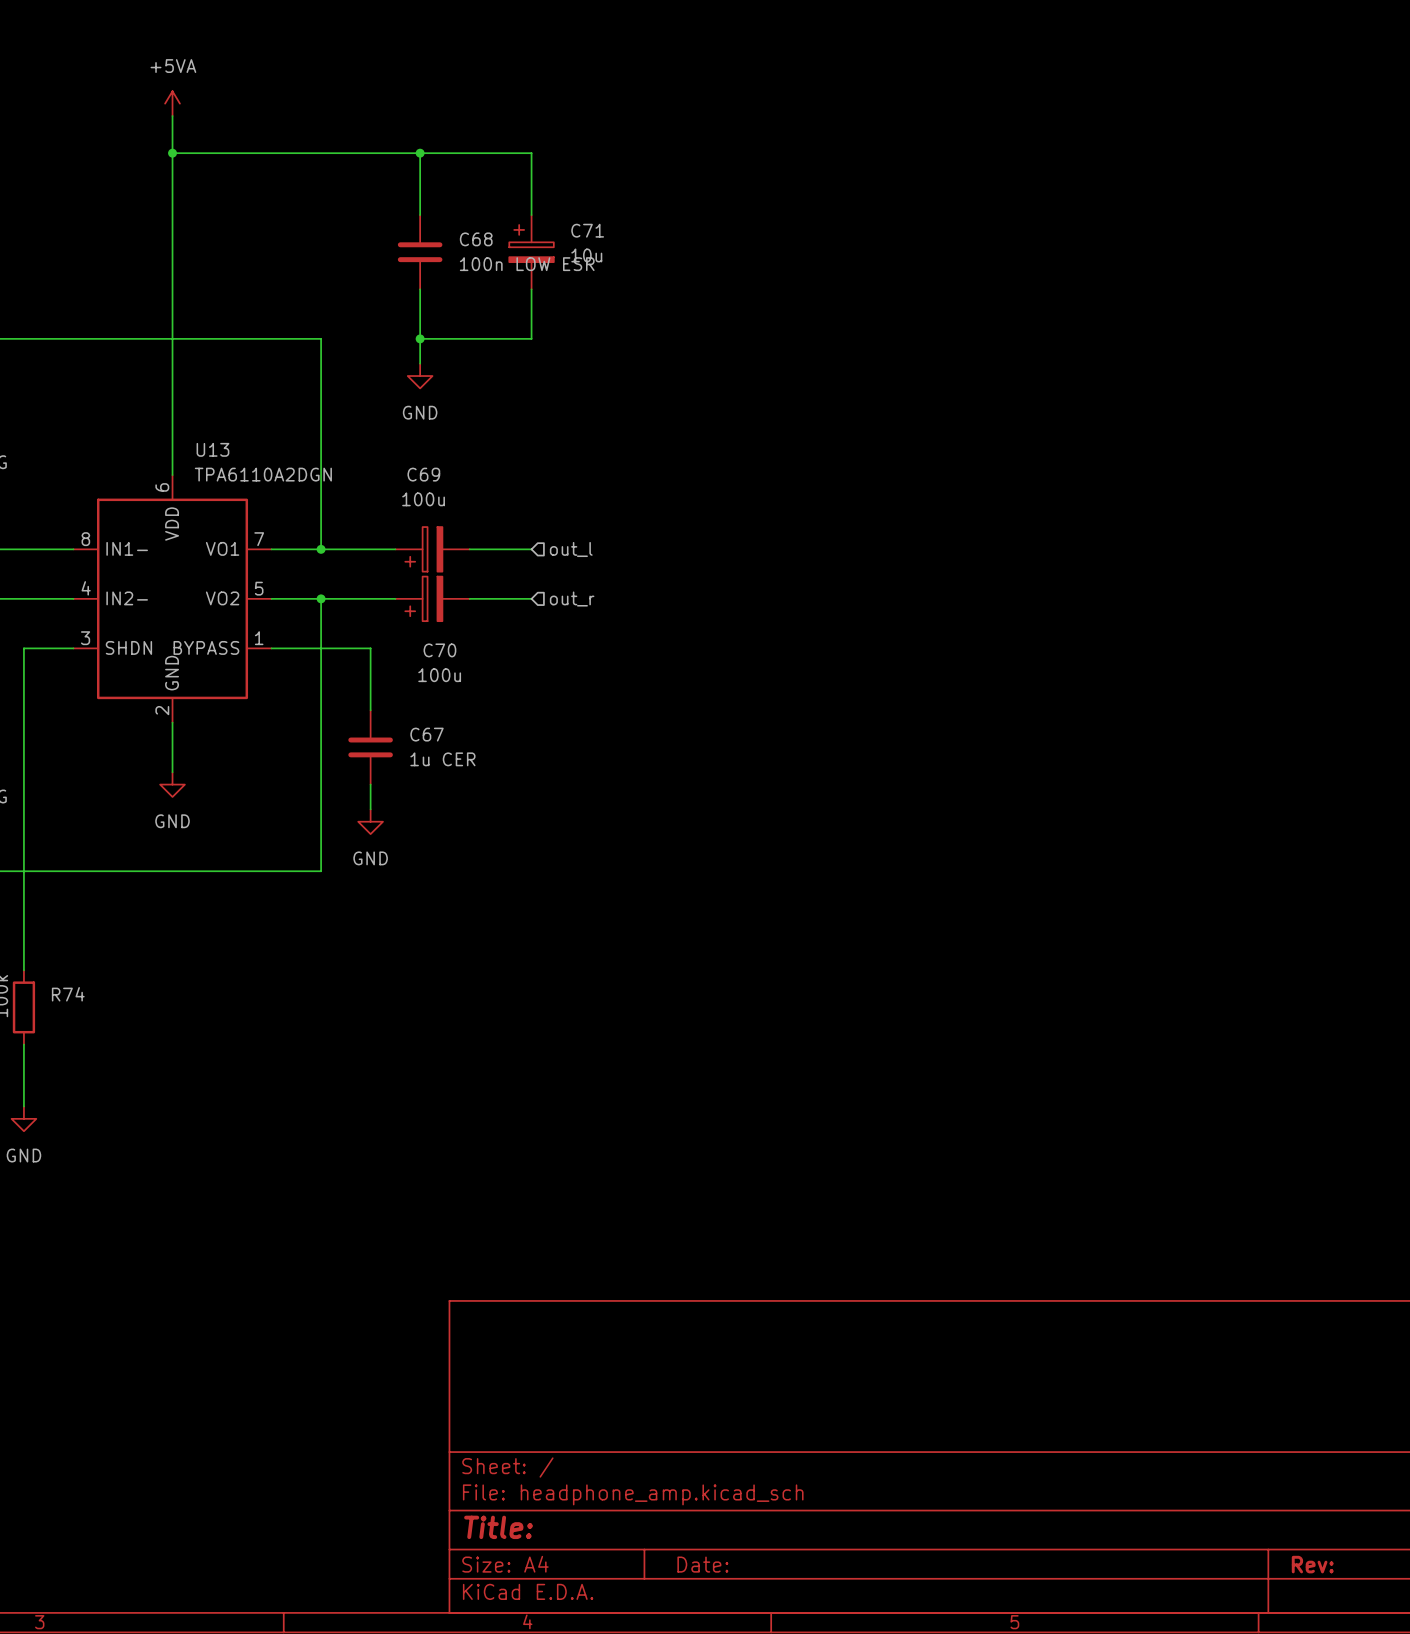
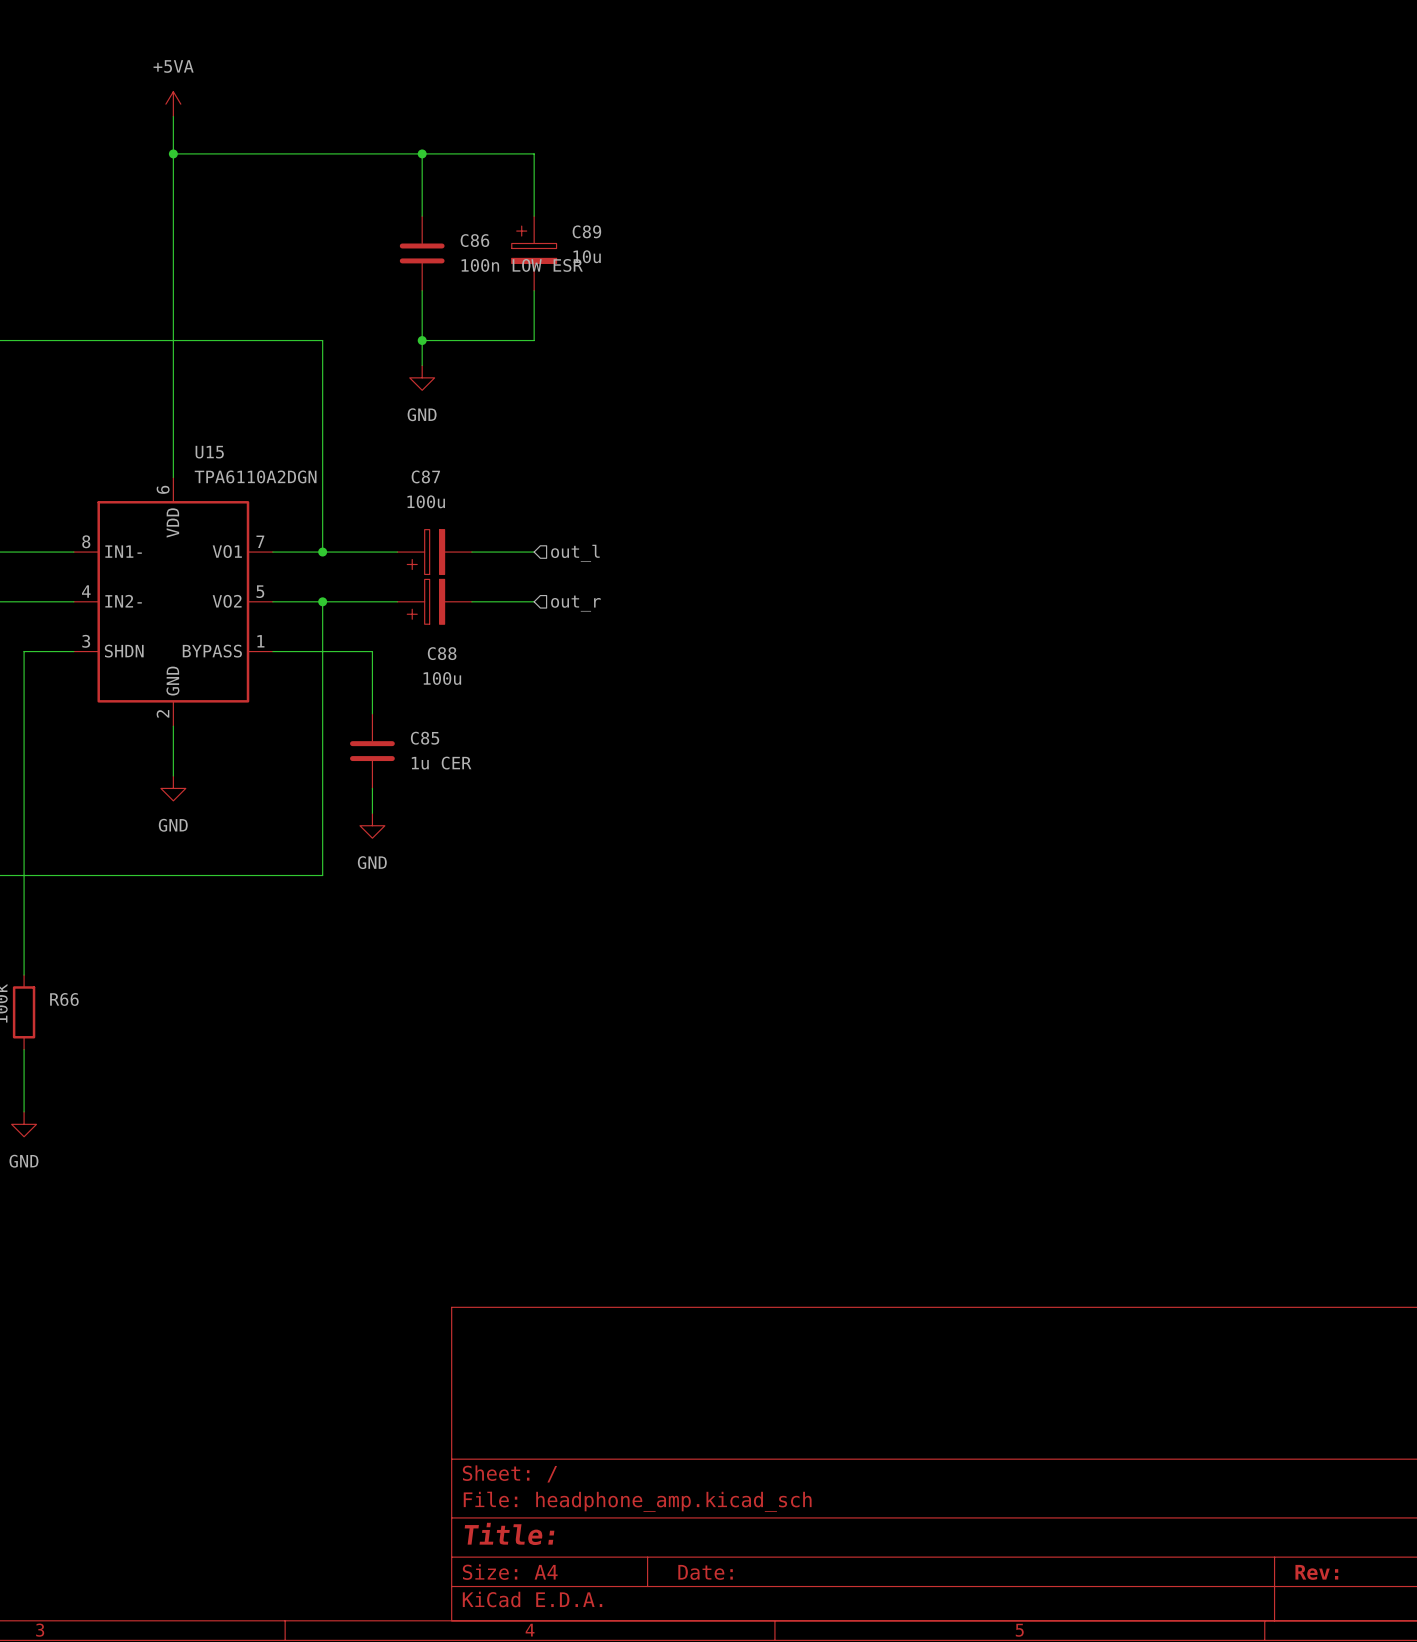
C71 name: C71 (587, 230) -> C89 (586, 231)
C68 name: C68 (476, 239) -> C86 (474, 240)
U13 name: U13 (212, 449) -> U15 (209, 452)
C69 name: C69 (423, 474) -> C87 (425, 476)
C70 name: C70 (439, 650) -> C88 (442, 653)
C67 name: C67 (427, 734) -> C85 (425, 738)
R74 name: R74 (68, 994) -> R66 (64, 999)

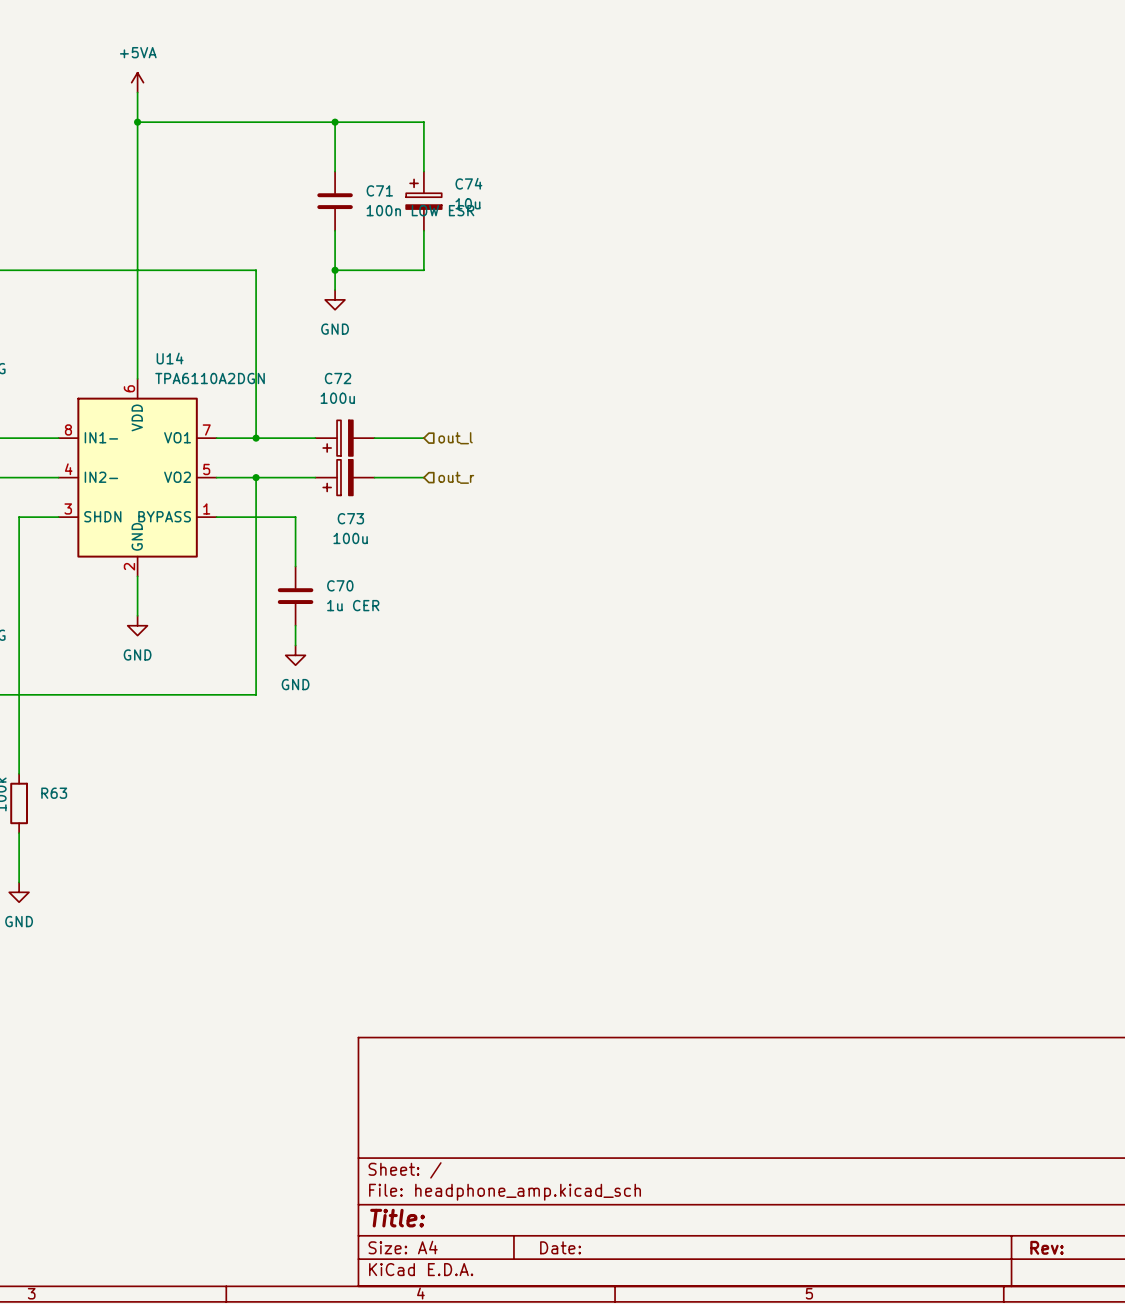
C89 name: C89 (586, 231) -> C74 (468, 183)
C86 name: C86 (474, 240) -> C71 (379, 190)
U15 name: U15 (209, 452) -> U14 (170, 358)
C87 name: C87 (425, 476) -> C72 (338, 378)
C88 name: C88 (442, 653) -> C73 (350, 518)
C85 name: C85 (425, 738) -> C70 (340, 585)
R66 name: R66 (64, 999) -> R63 (54, 793)

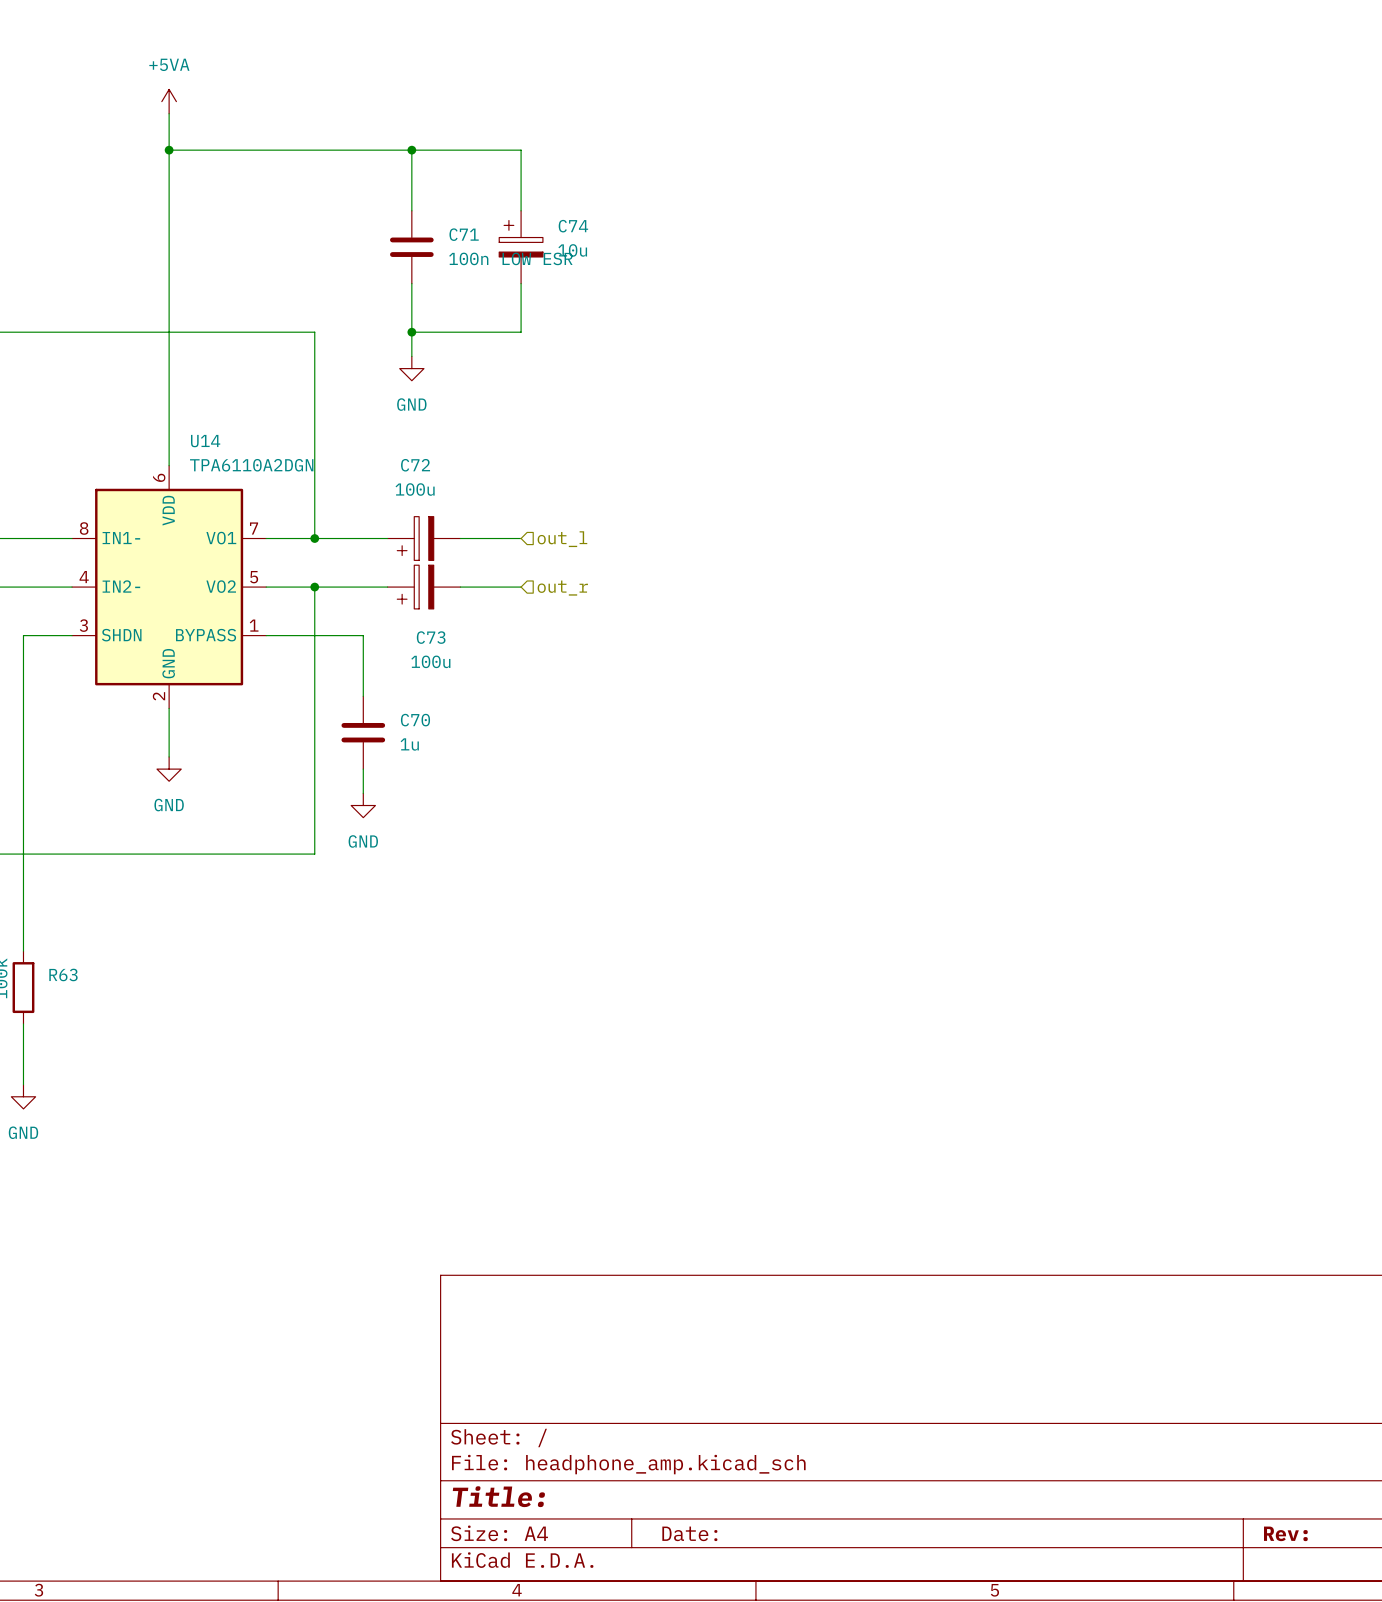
C70 value: 1u CER (353, 605) -> 1u (409, 744)

